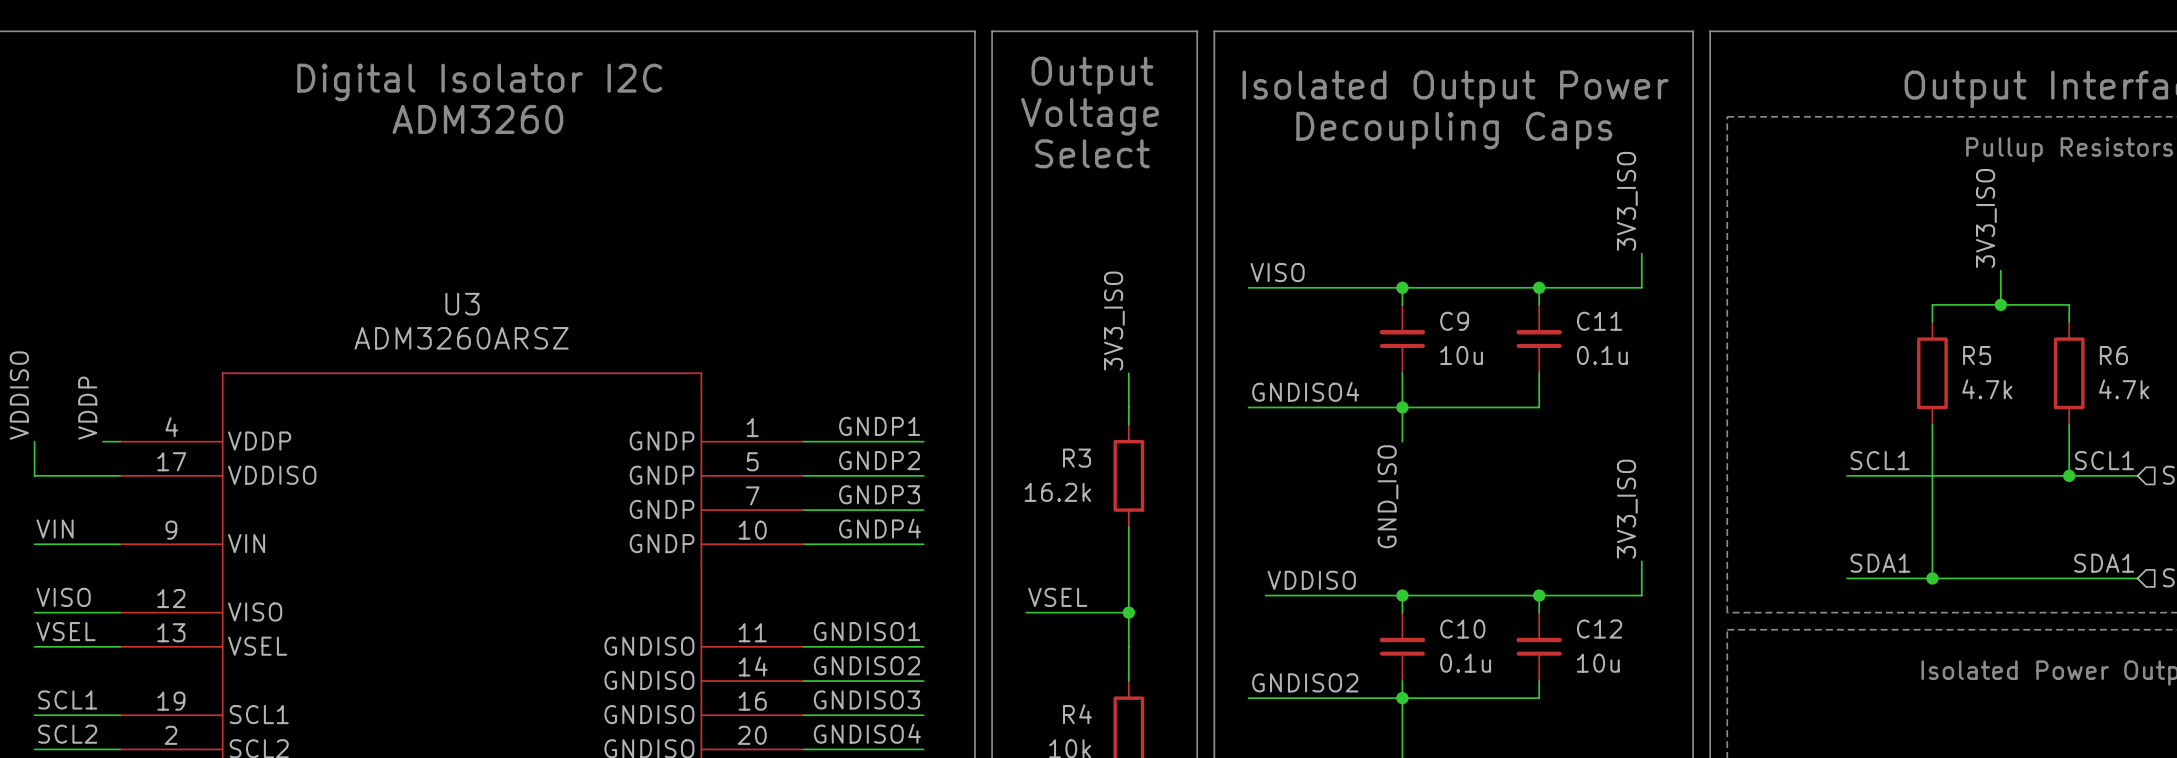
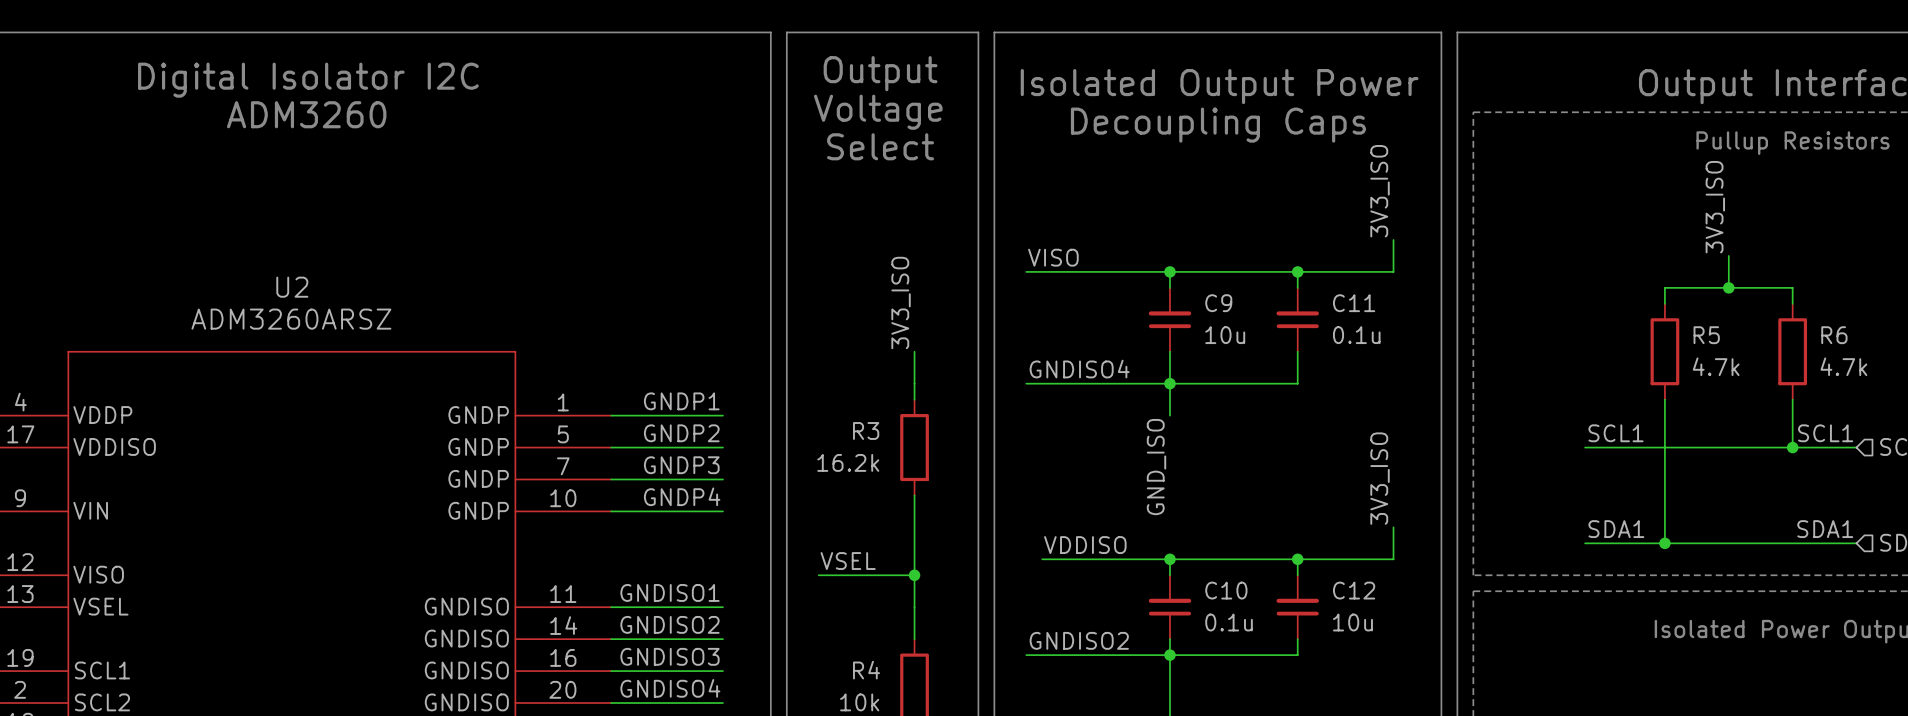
U3 name: U3 (462, 304) -> U2 (292, 287)

